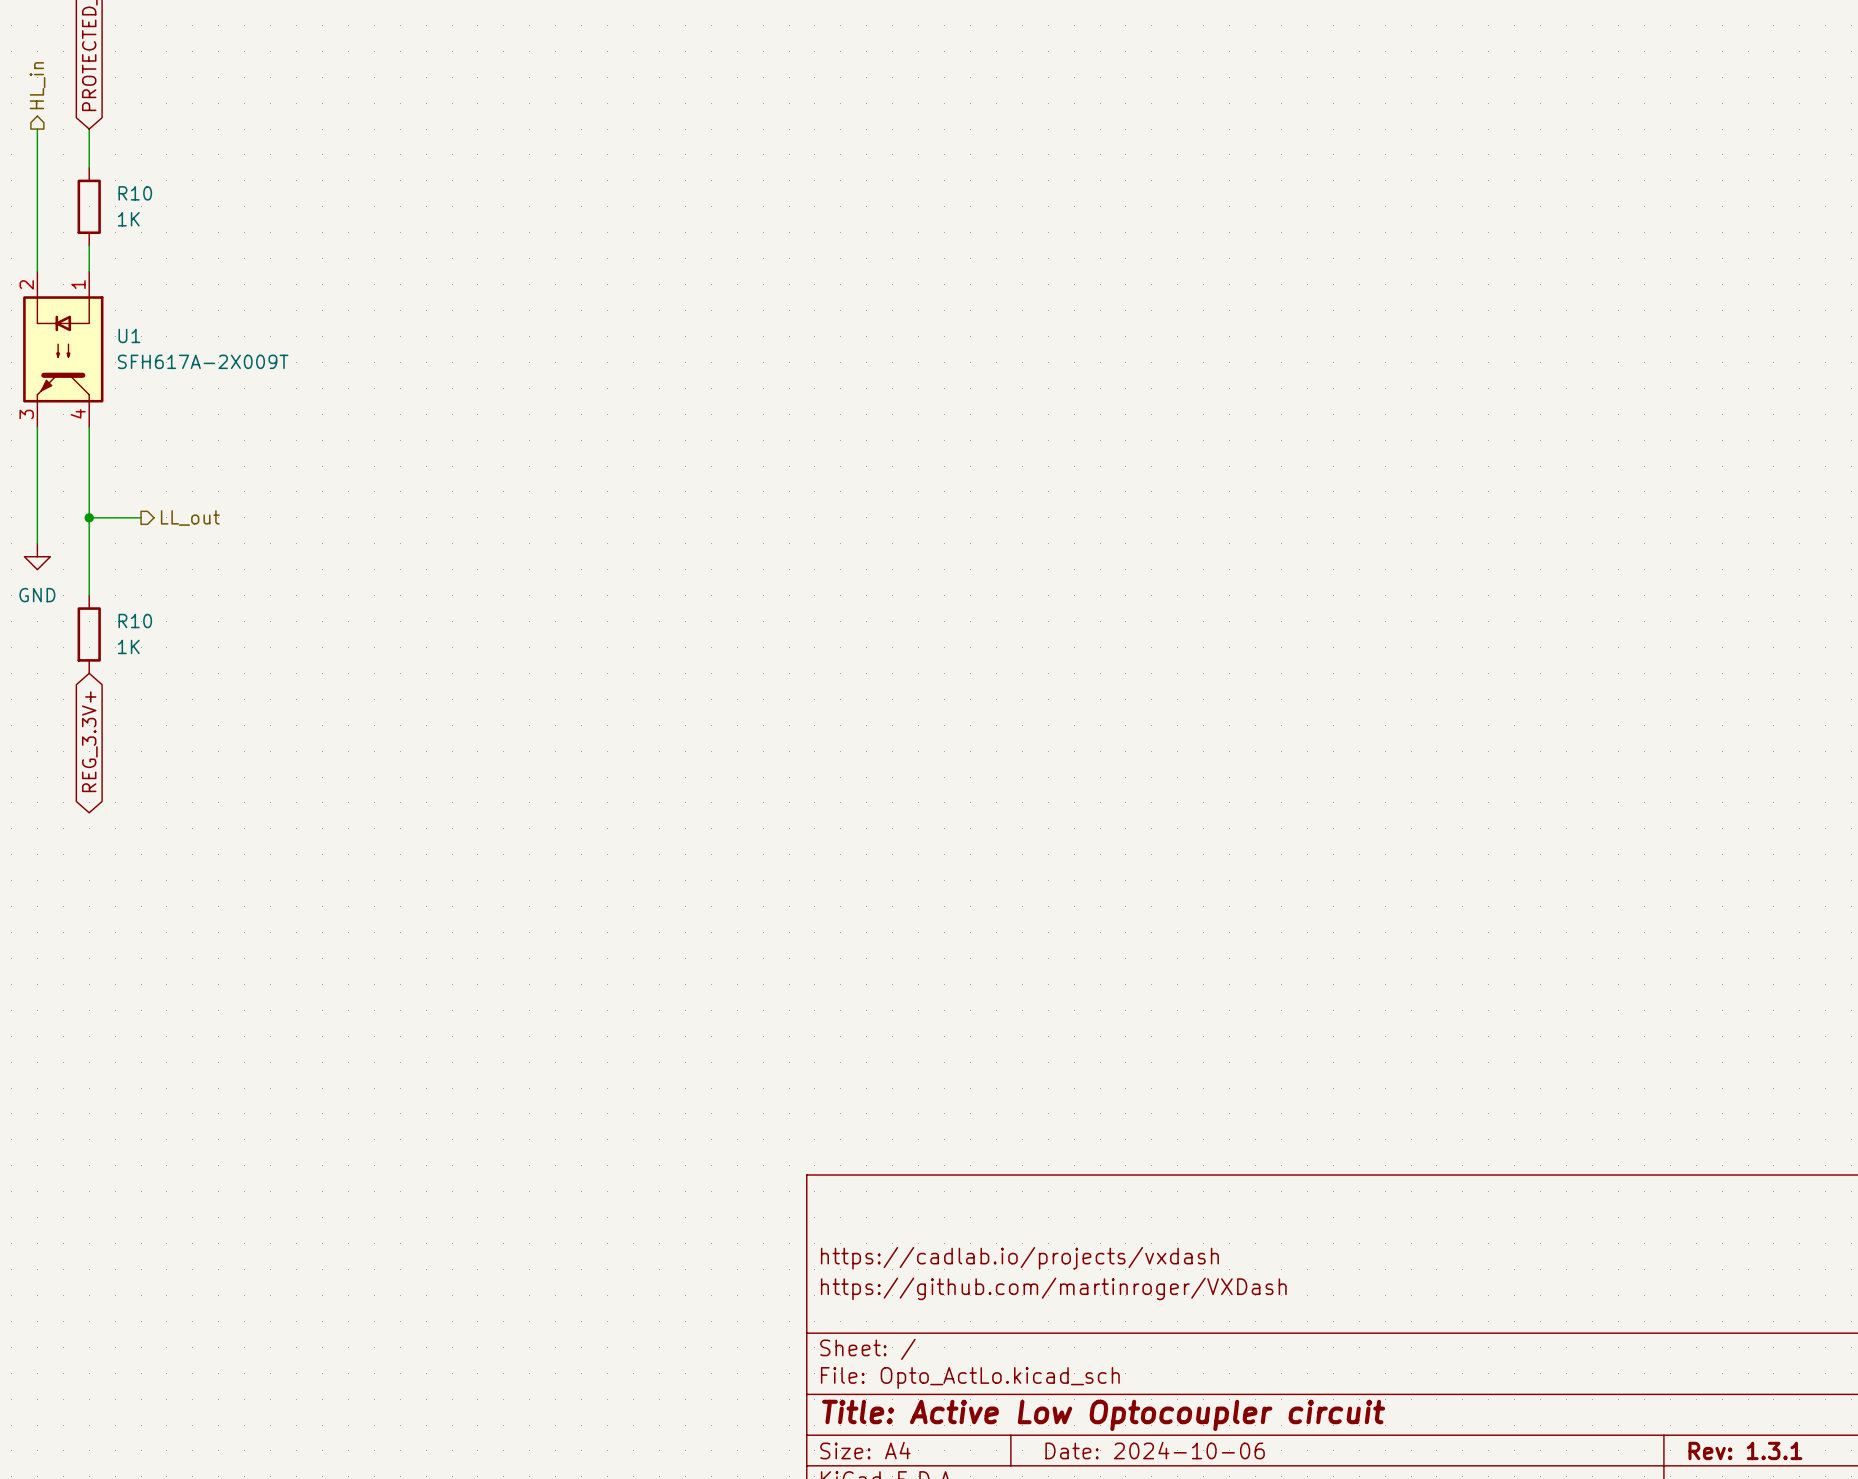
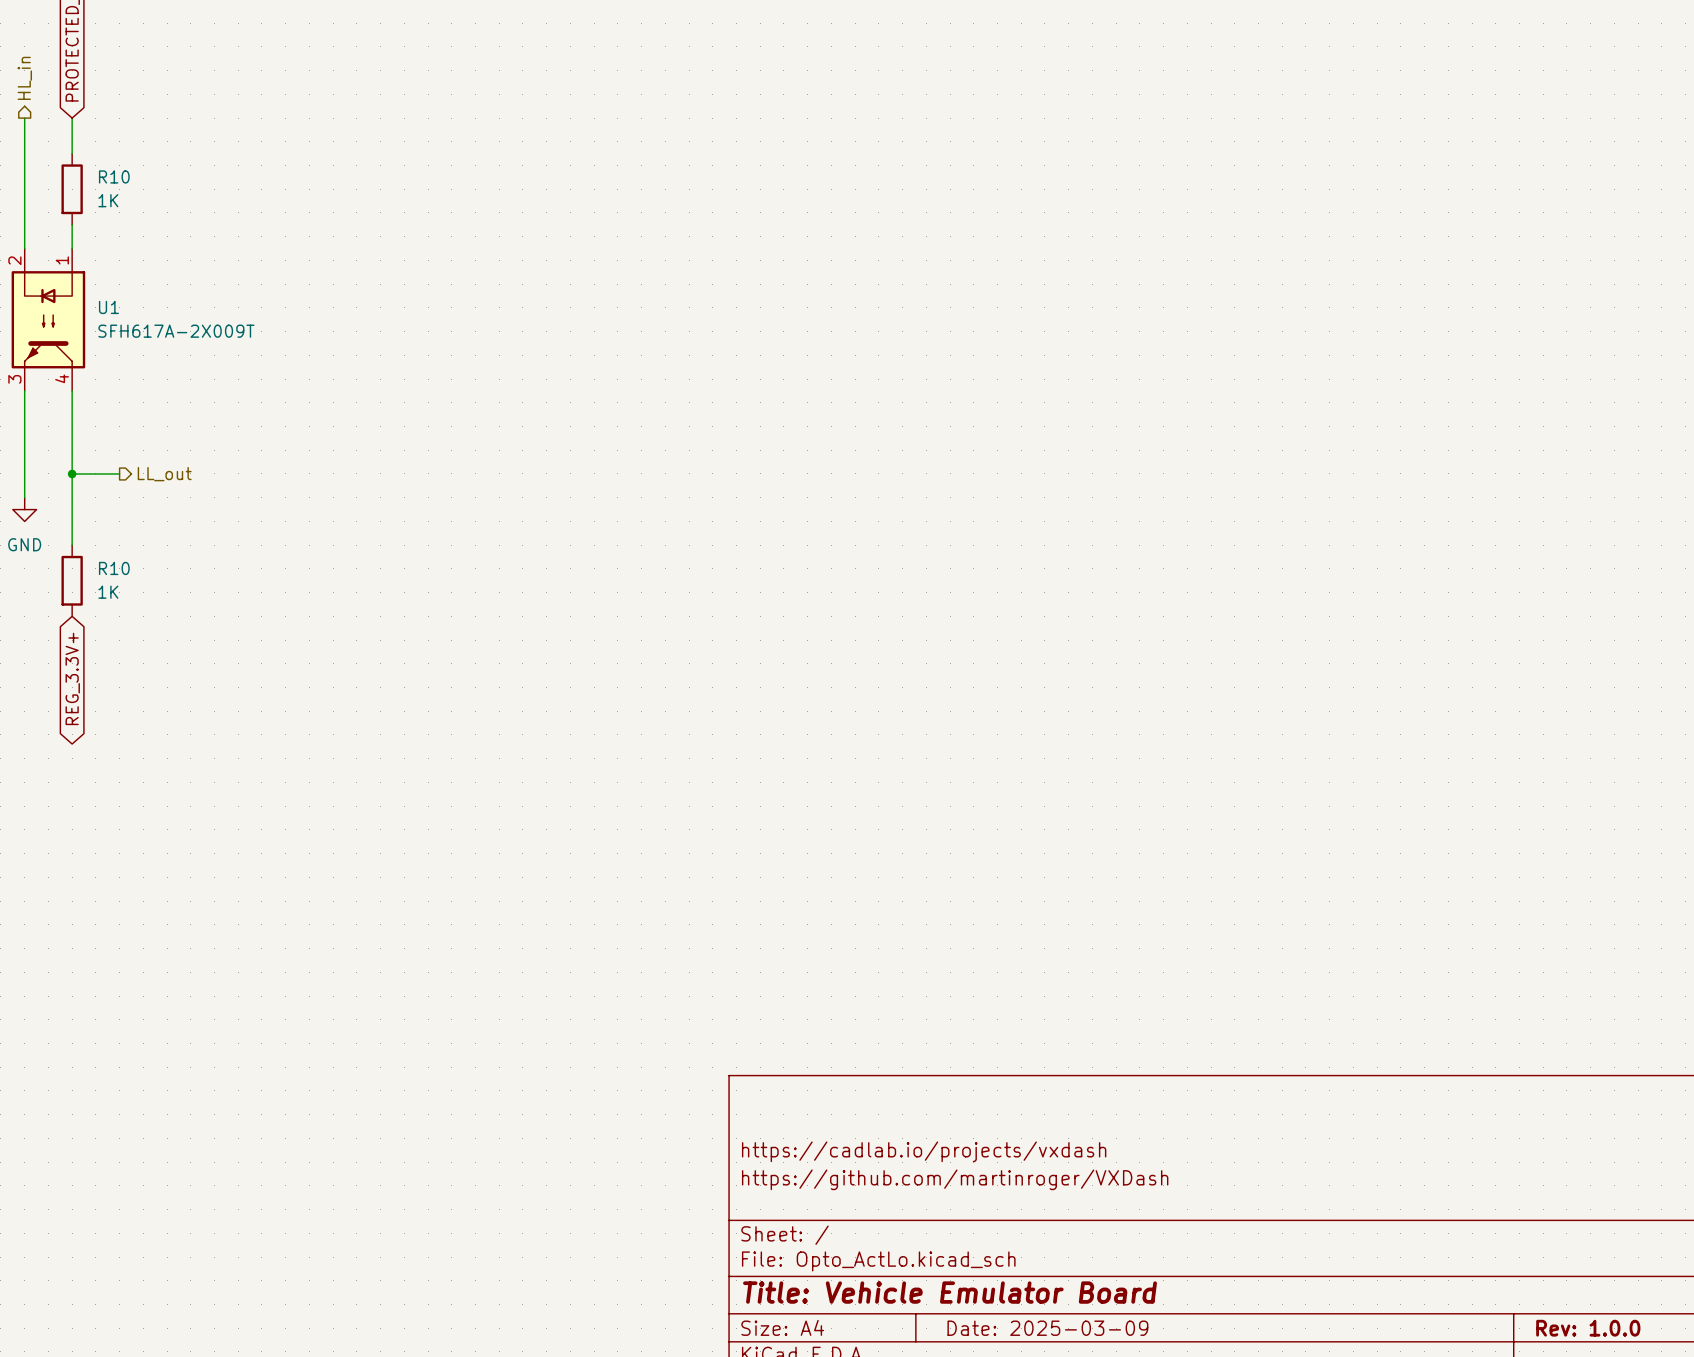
title block: Title: Active Low Optocoupler circuit (1103, 1415) -> Title: Vehicle Emulator Board (950, 1292)
title block: Date: 2024-10-06 (1155, 1450) -> Date: 2025-03-09 (1047, 1328)
title block: Rev: 1.3.1 (1745, 1450) -> Rev: 1.0.0 (1588, 1328)

